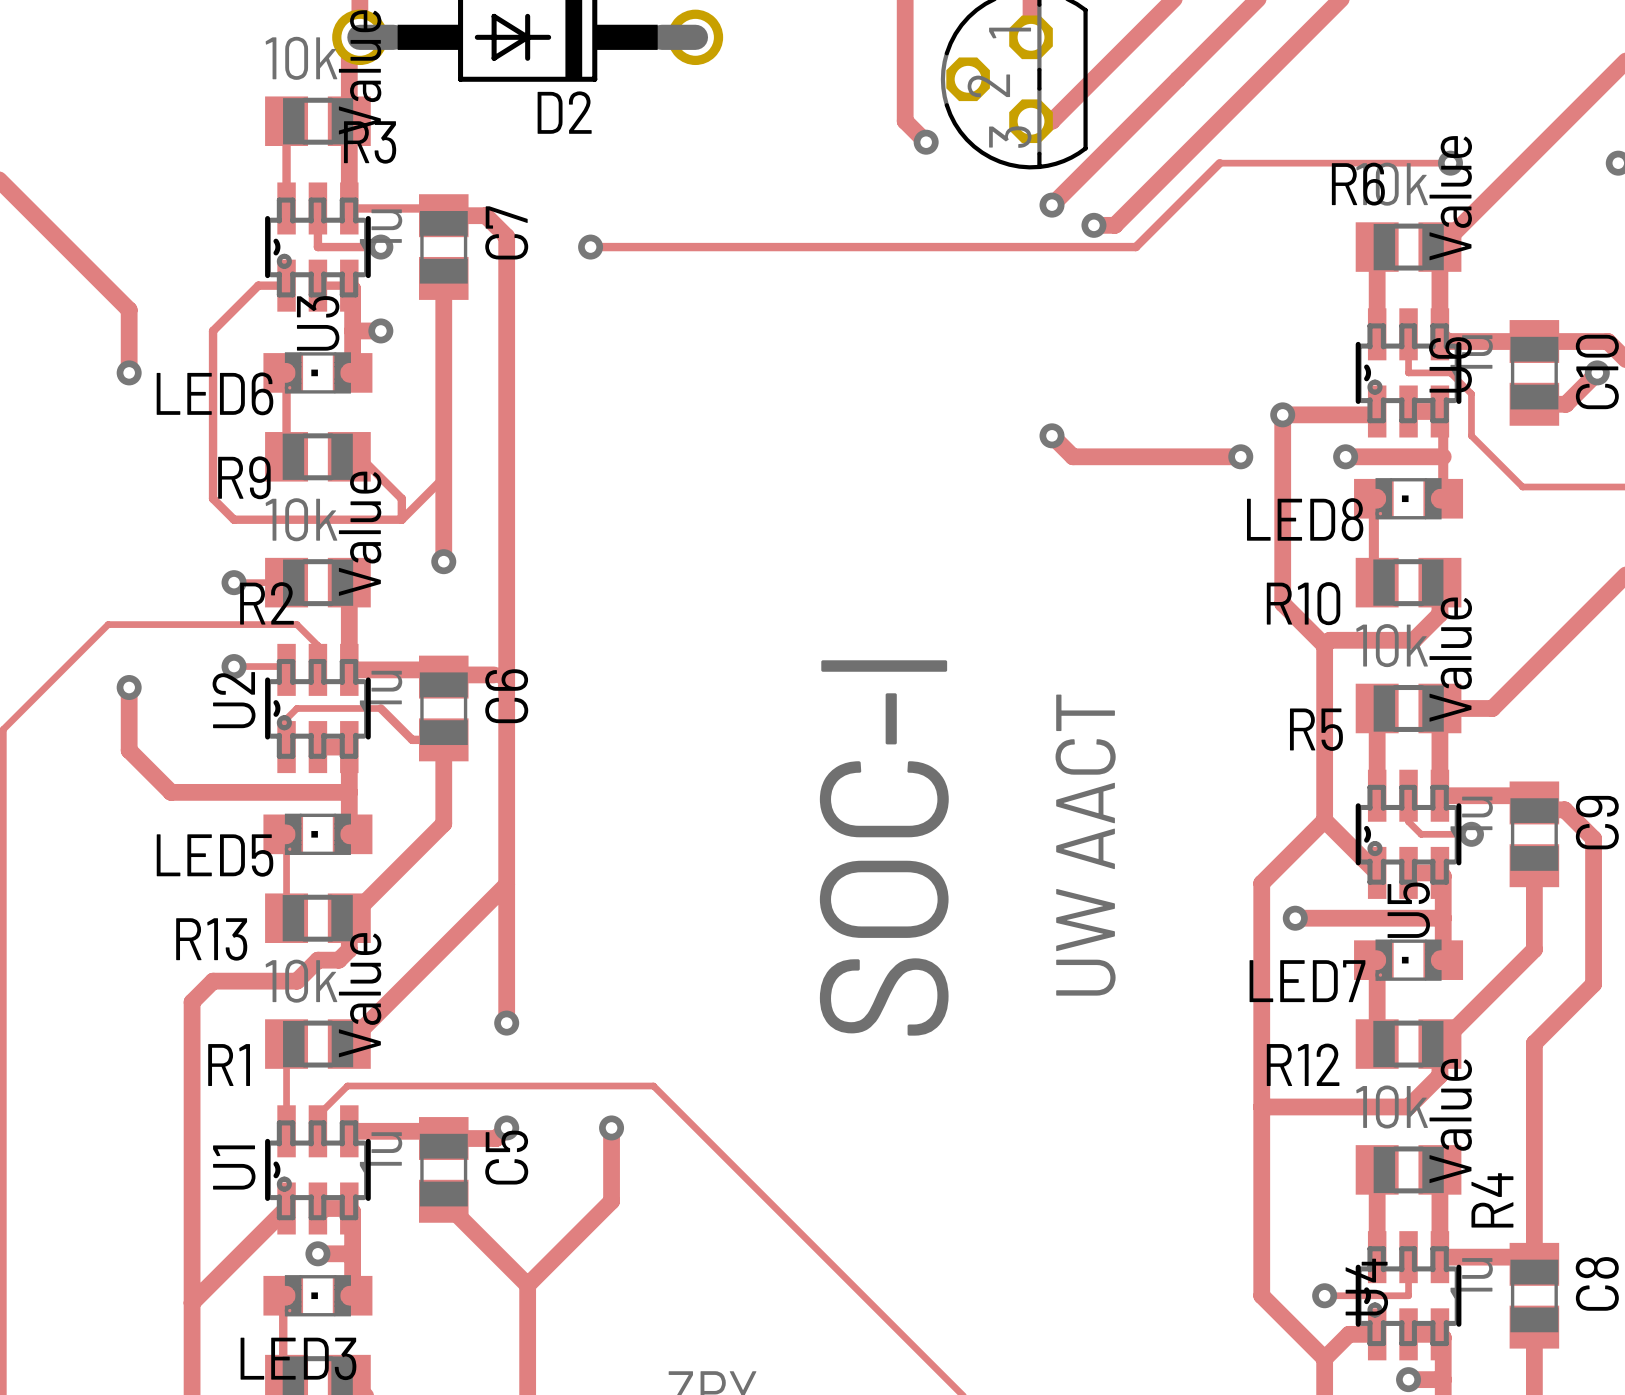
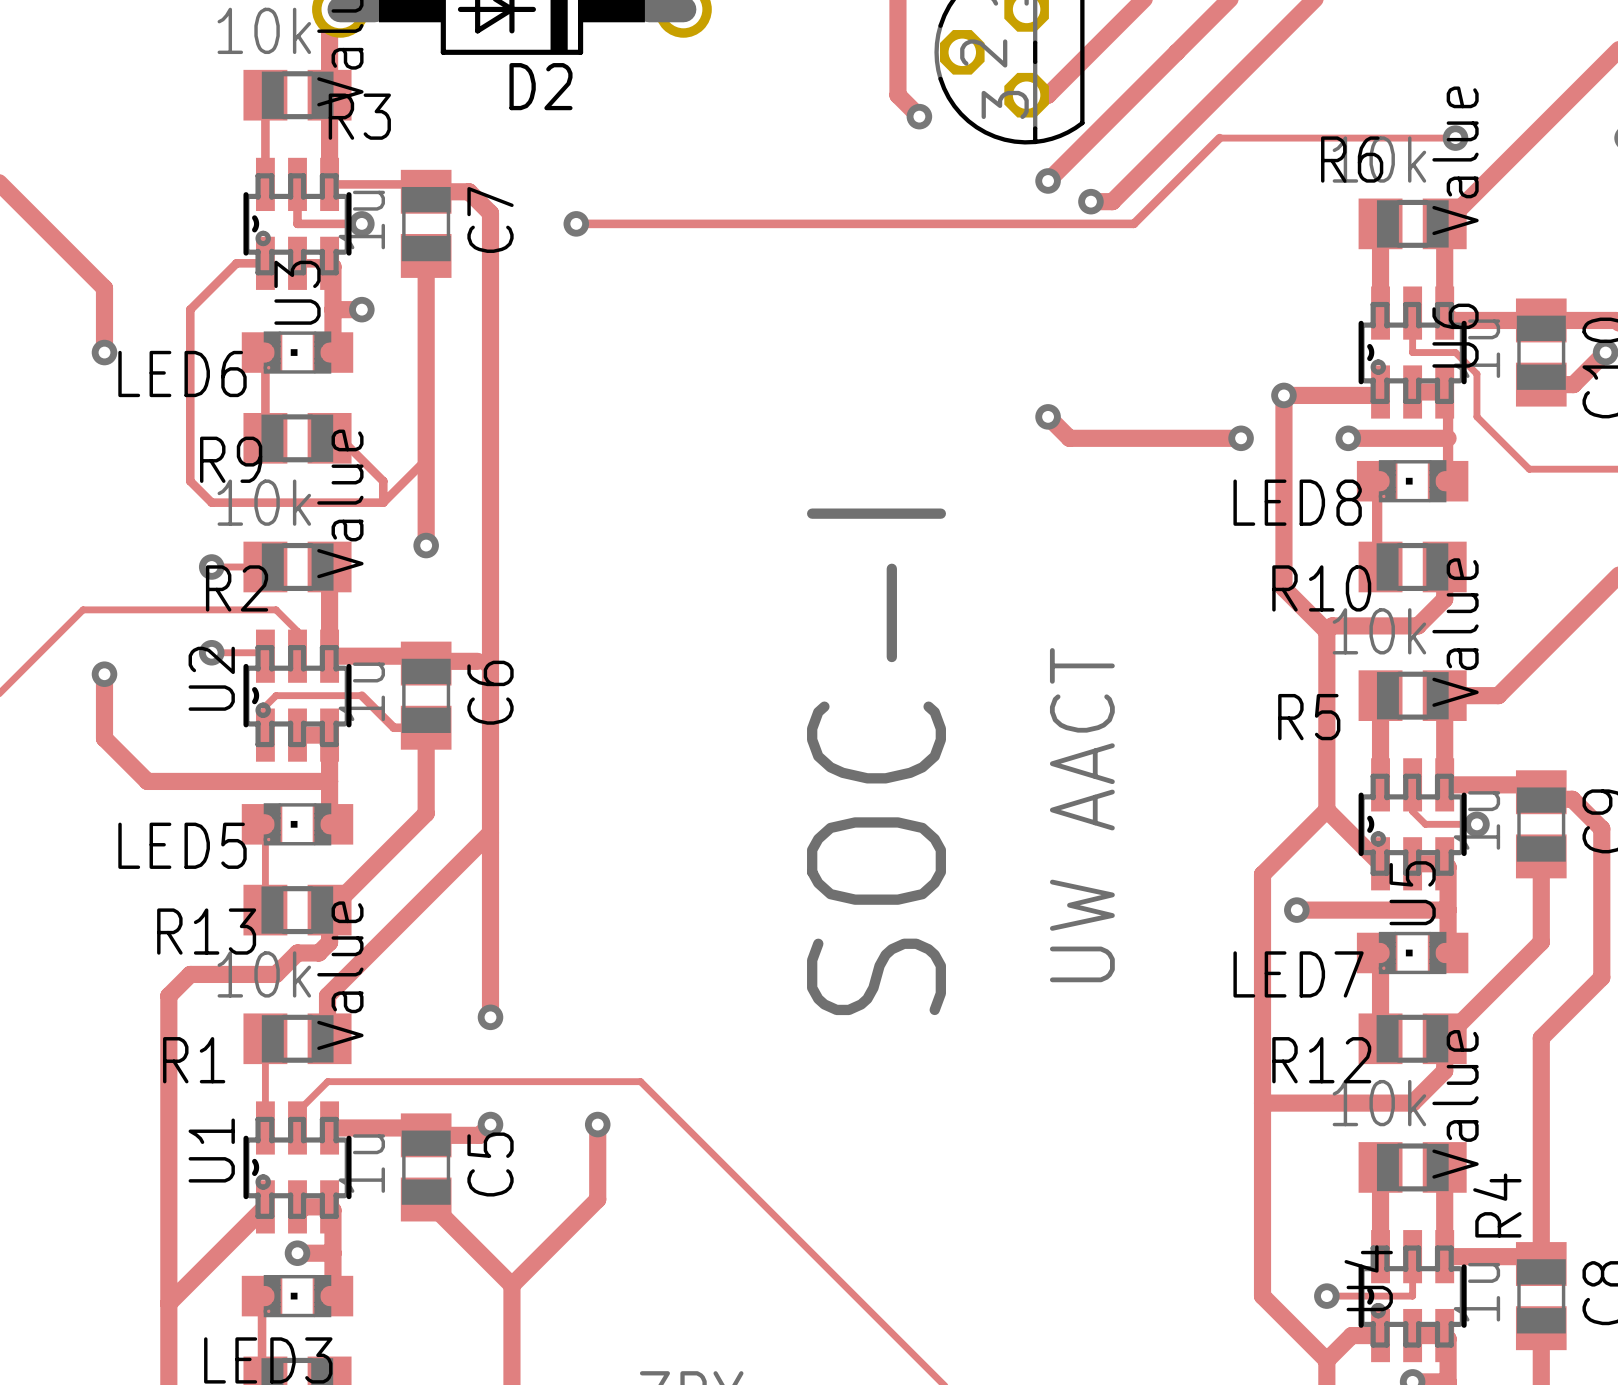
track: (506, 884) (348, 1043) -> (490, 832) (327, 995) (328, 1037)

